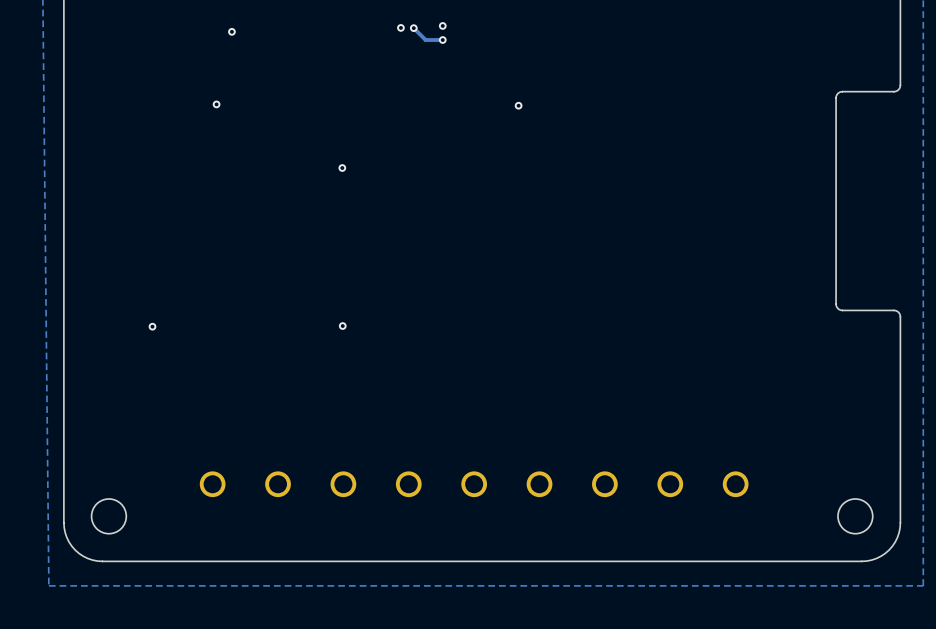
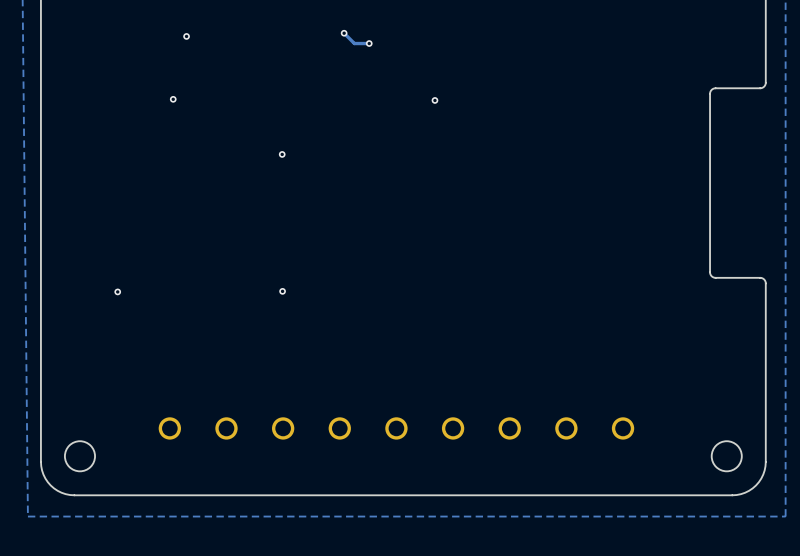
via: (442, 25) -> none
via: (400, 27) -> none

